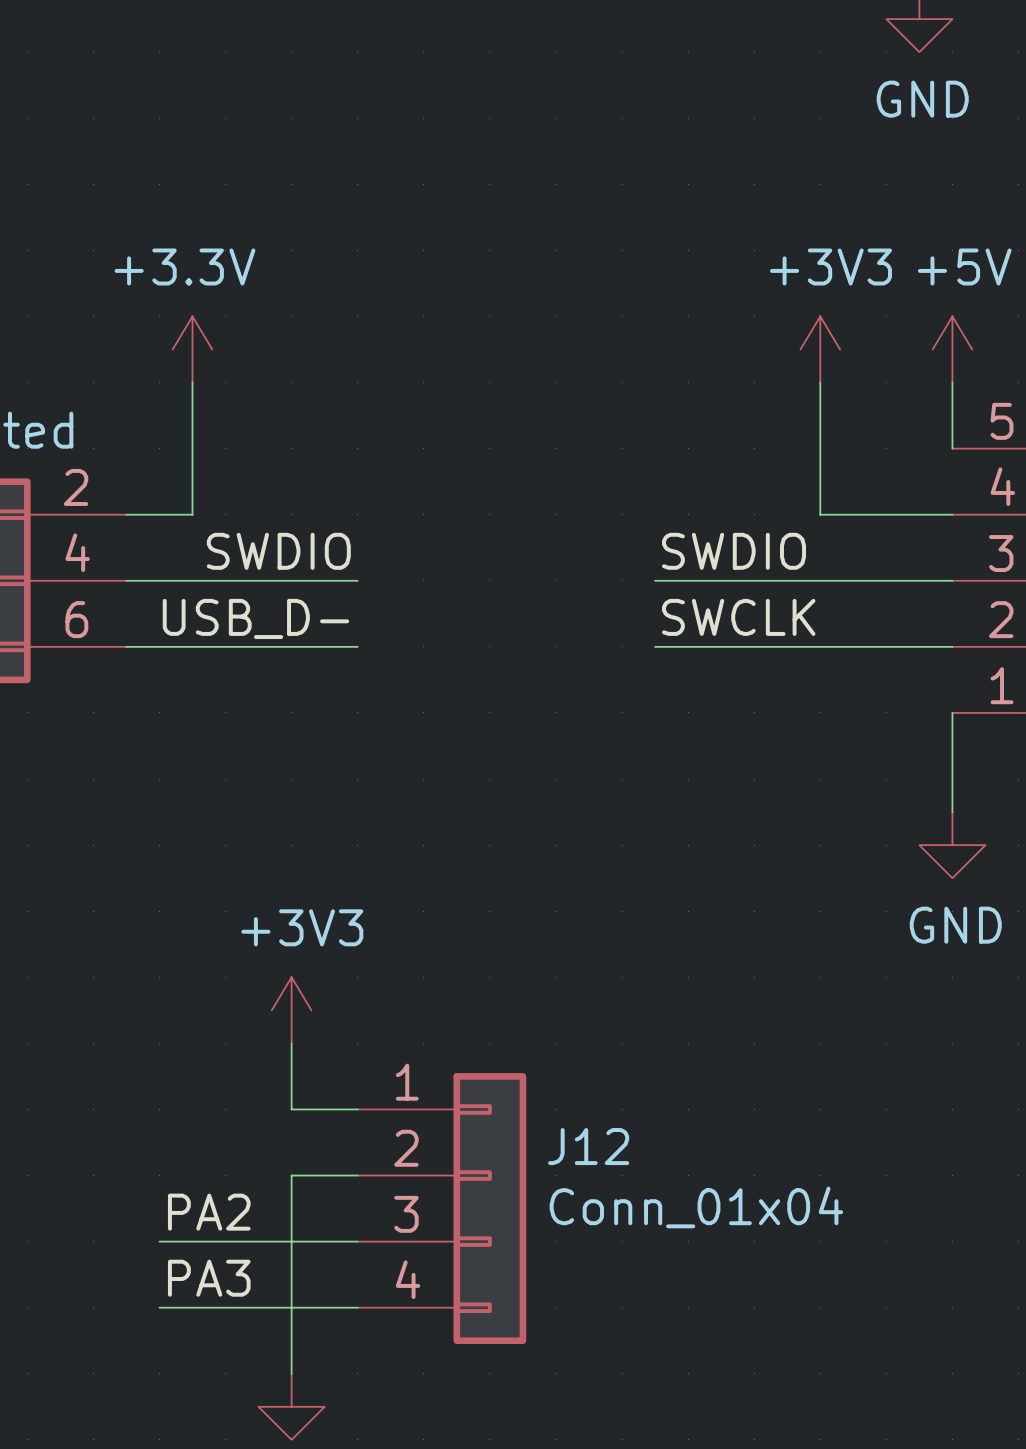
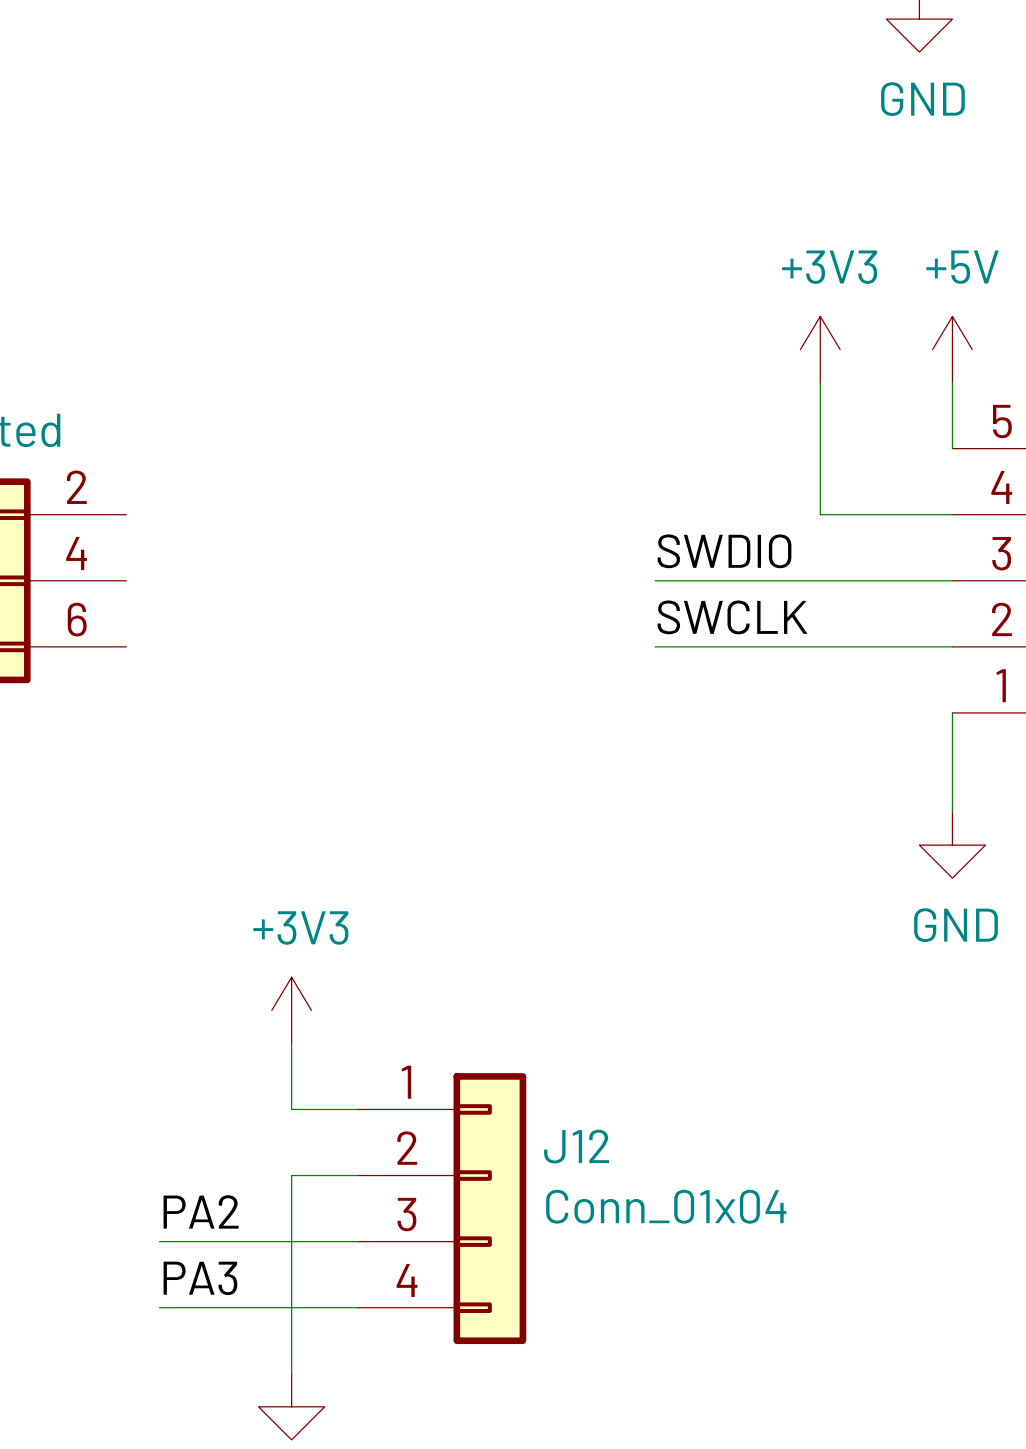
power symbol: +3.3V (192, 349) -> none
wire: (192, 382) (192, 514) (126, 514) -> none
label: SWDIO (278, 551) -> none
wire: (126, 580) (357, 580) -> none
label: USB_D- (255, 618) -> none
wire: (126, 646) (357, 646) -> none

